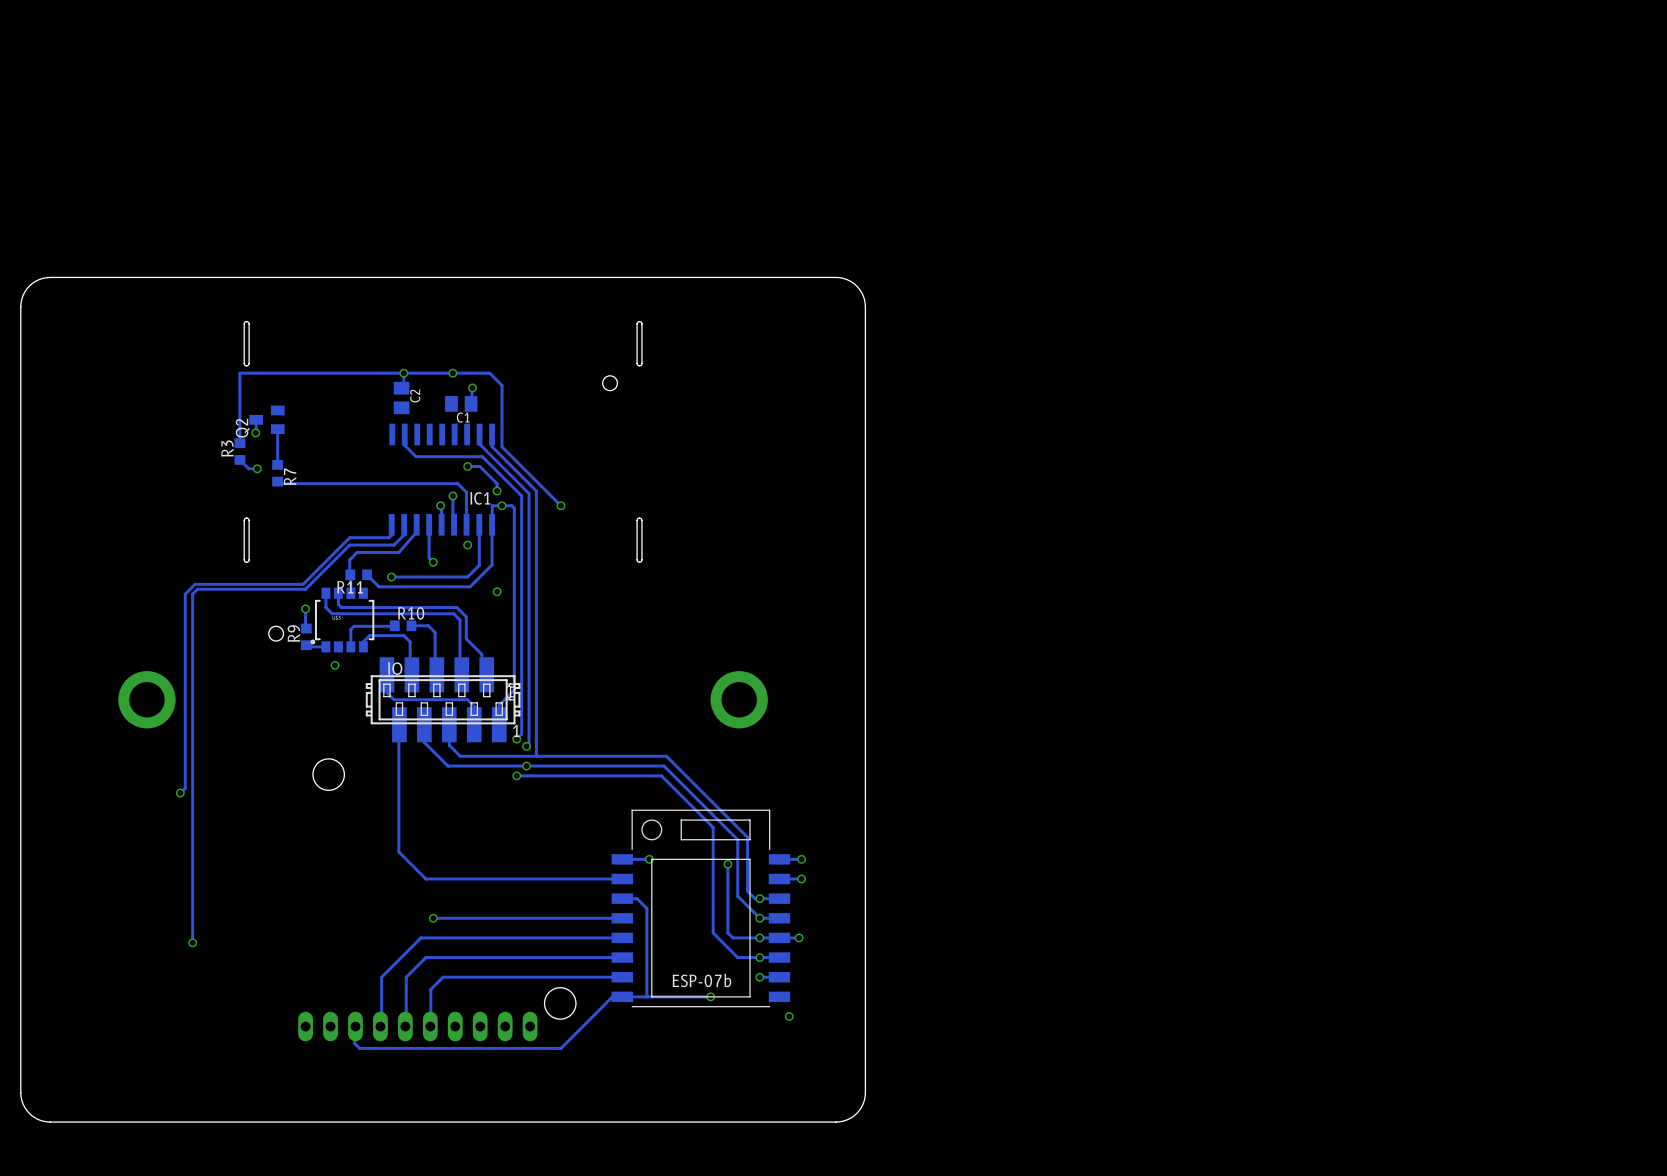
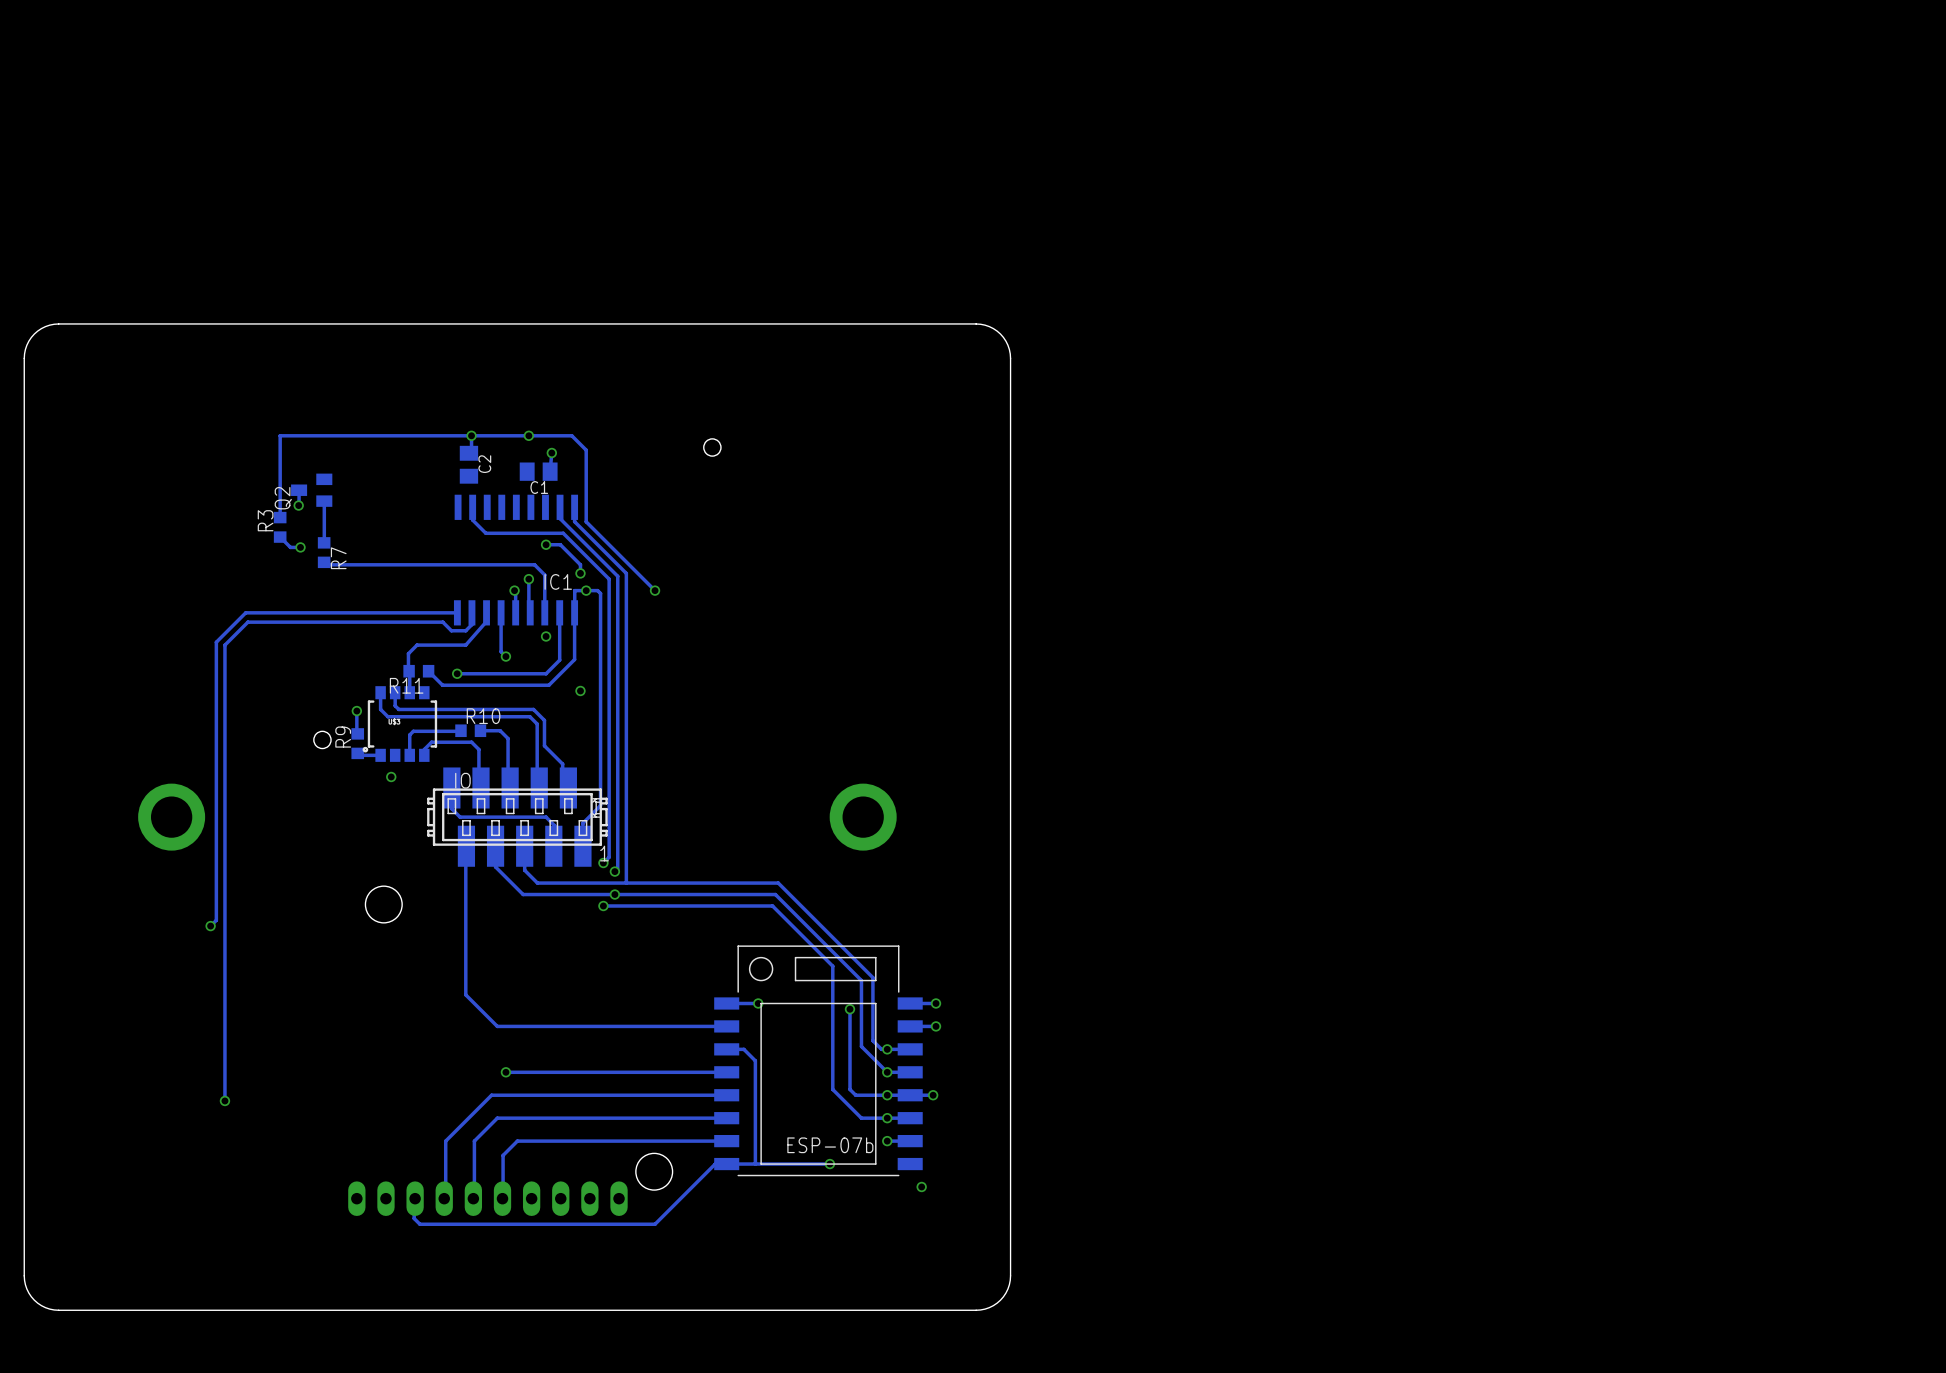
board edge: (246, 321) (244, 324) (244, 363) (246, 365) (249, 363) (249, 324) (246, 321) -> none
board edge: (639, 321) (637, 324) (637, 363) (639, 365) (641, 363) (641, 324) (639, 321) -> none
board edge: (246, 518) (244, 520) (244, 559) (246, 562) (249, 559) (249, 520) (246, 518) -> none
board edge: (639, 518) (637, 520) (637, 559) (639, 562) (641, 559) (641, 520) (639, 518) -> none
track: (391, 524) (391, 535) (389, 537) (349, 537) (303, 584) (195, 584) (185, 594) -> (457, 612) (245, 612) (216, 642) (216, 693)
track: (398, 540) (393, 545) (349, 545) (305, 589) (197, 589) (192, 594) -> (465, 630) (451, 630) (442, 622) (247, 622) (224, 645) (224, 693)

